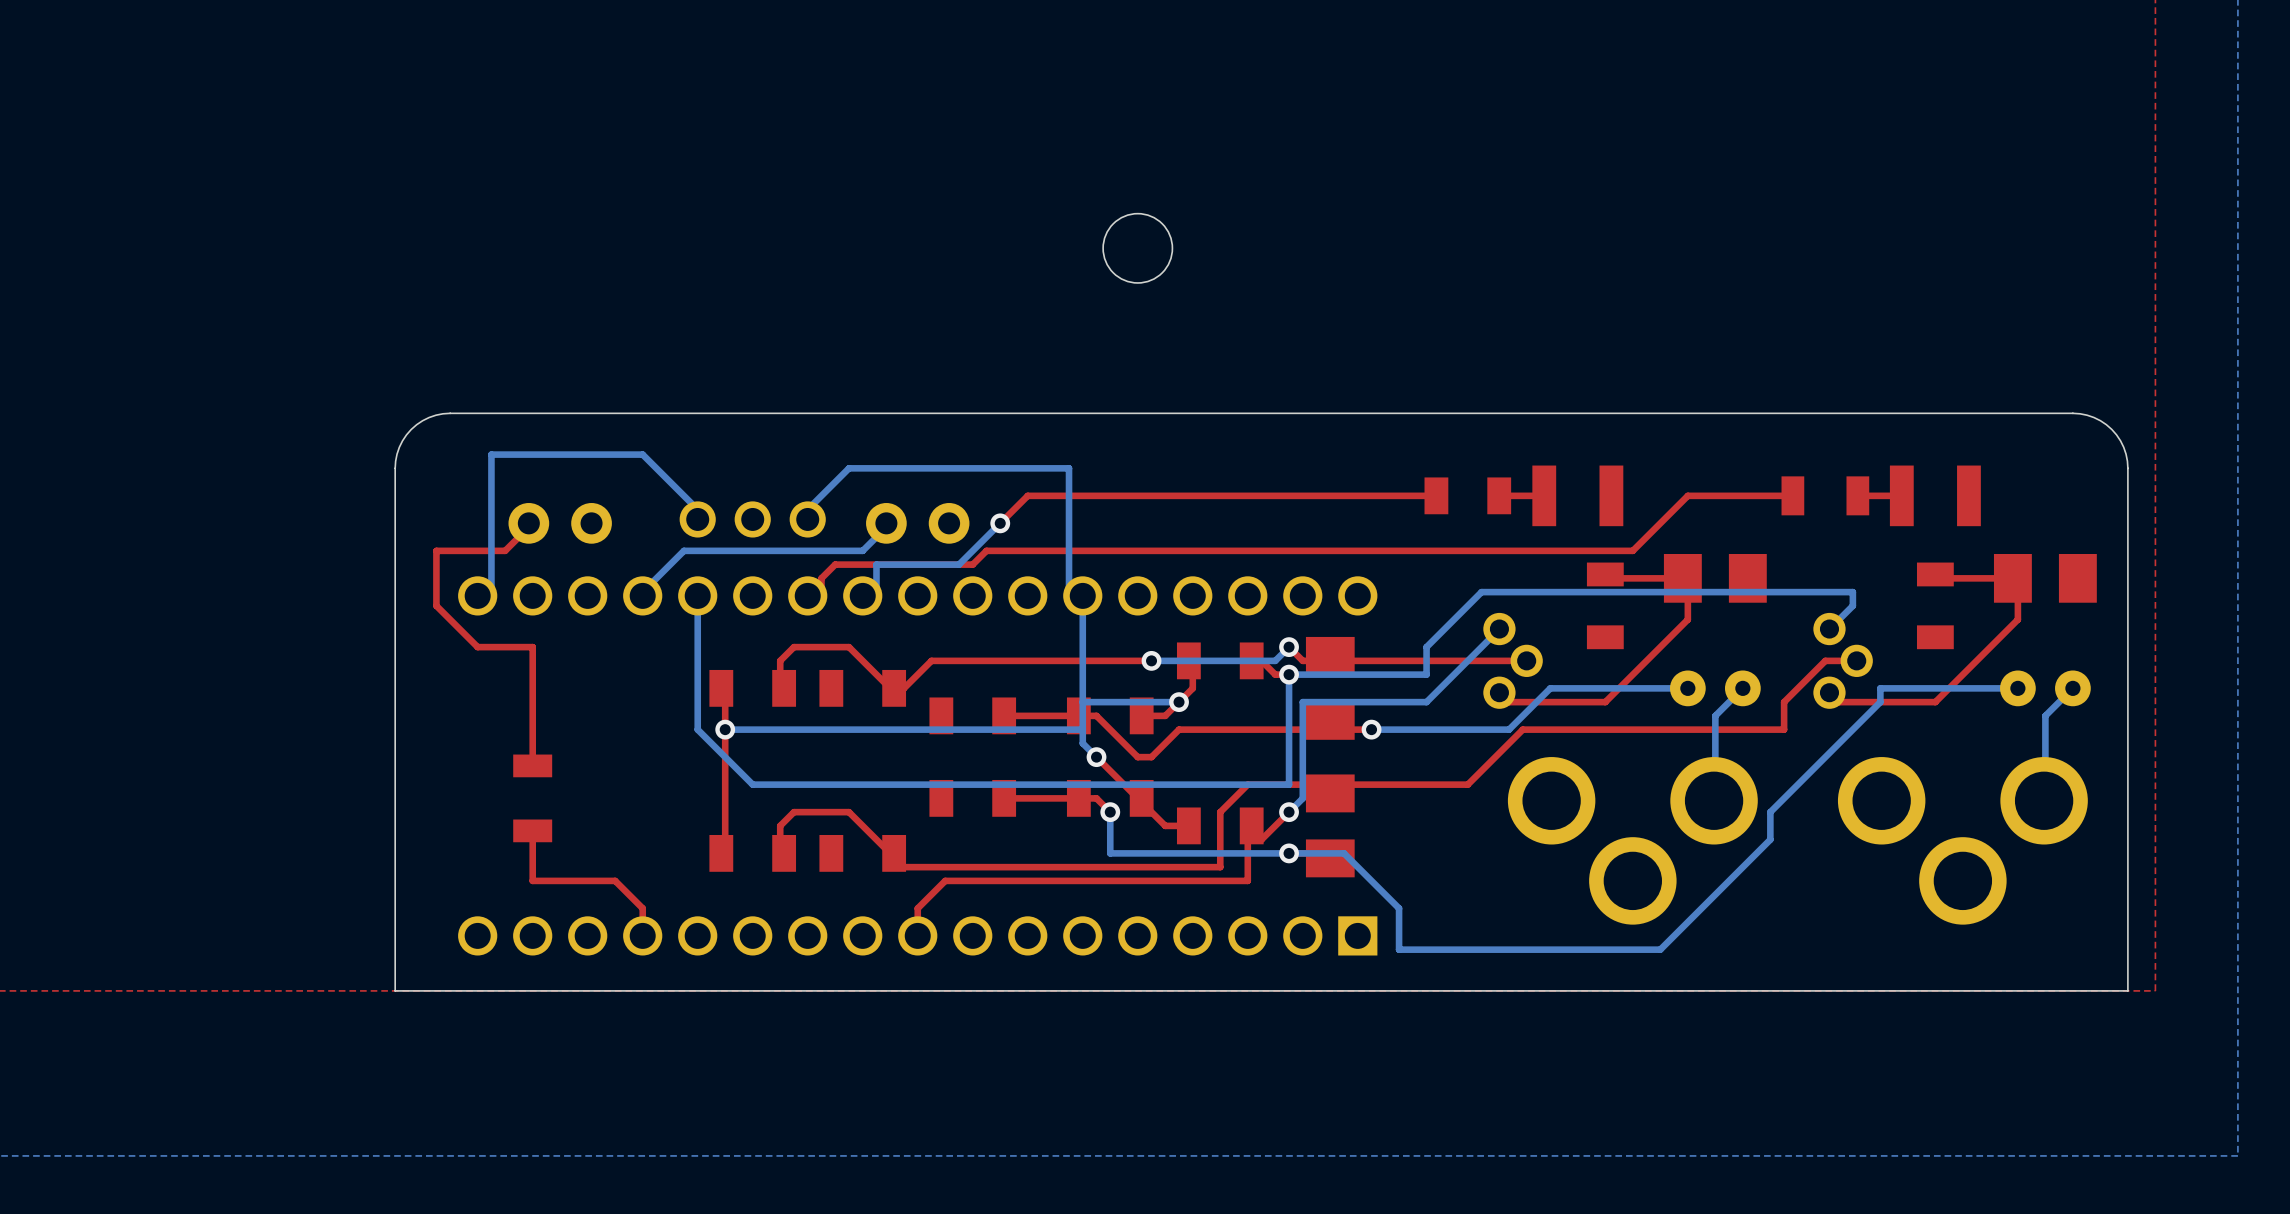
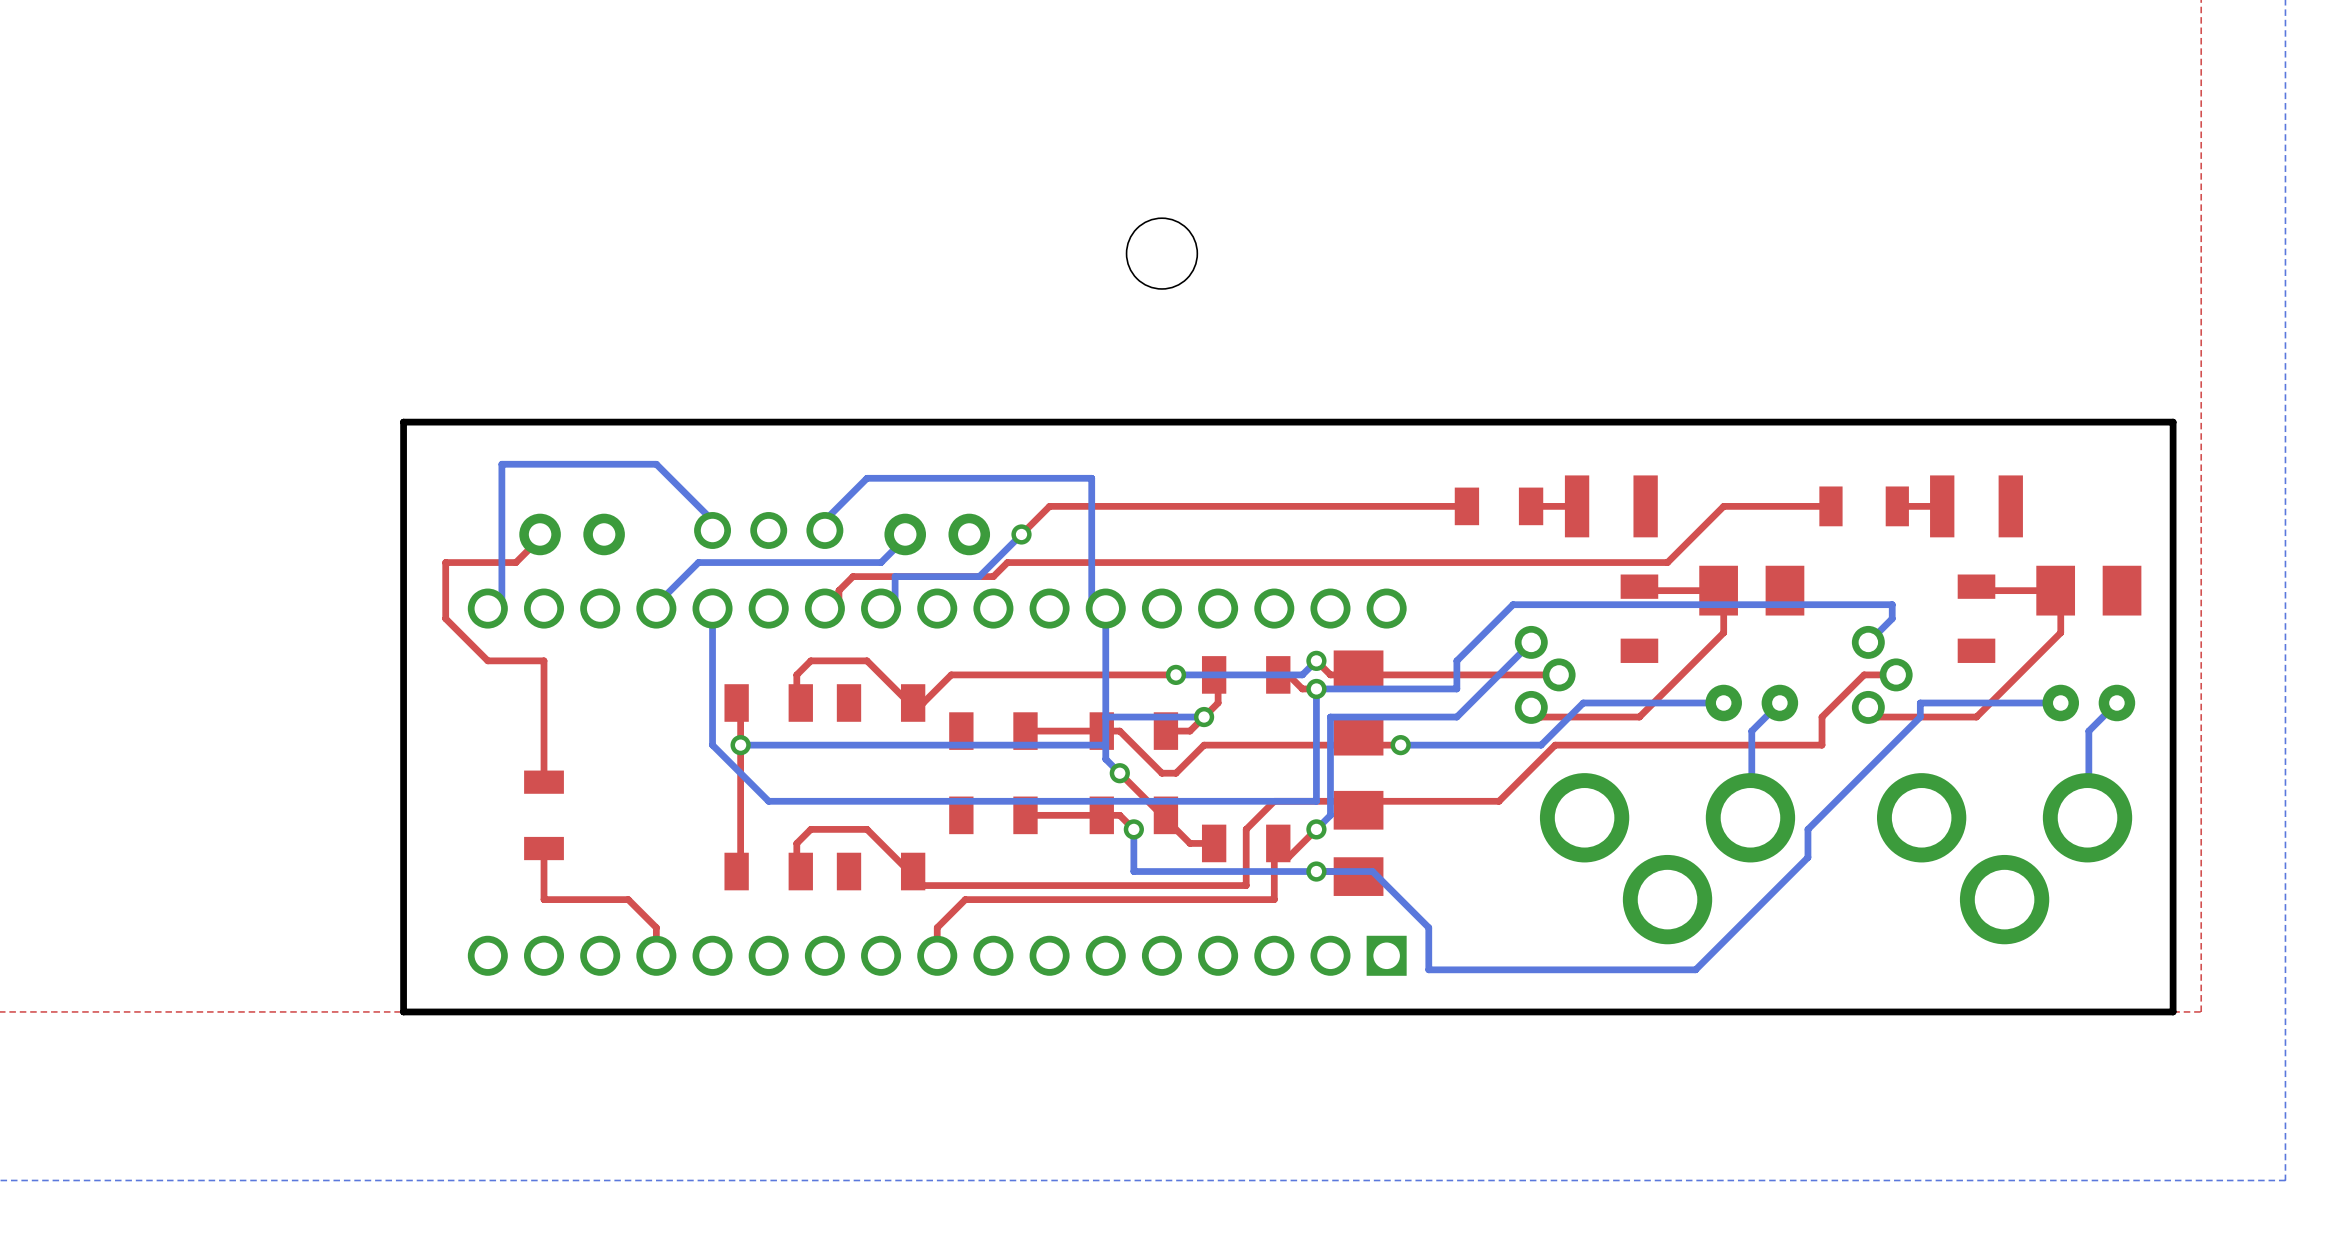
board edge: (450, 413) (429, 417) (411, 429) (399, 447) (395, 468) -> (459, 422) (403, 422) (403, 478)
board edge: (2072, 413) (2093, 417) (2111, 429) (2123, 447) (2127, 468) -> (2116, 422) (2173, 422) (2173, 478)
board edge width: thin (2072, 413) (450, 413) -> thick (2116, 422) (459, 422)
board edge width: thin (2127, 468) (2127, 990) (395, 990) (395, 468) -> thick (2173, 478) (2173, 1011) (403, 1011) (403, 478)

